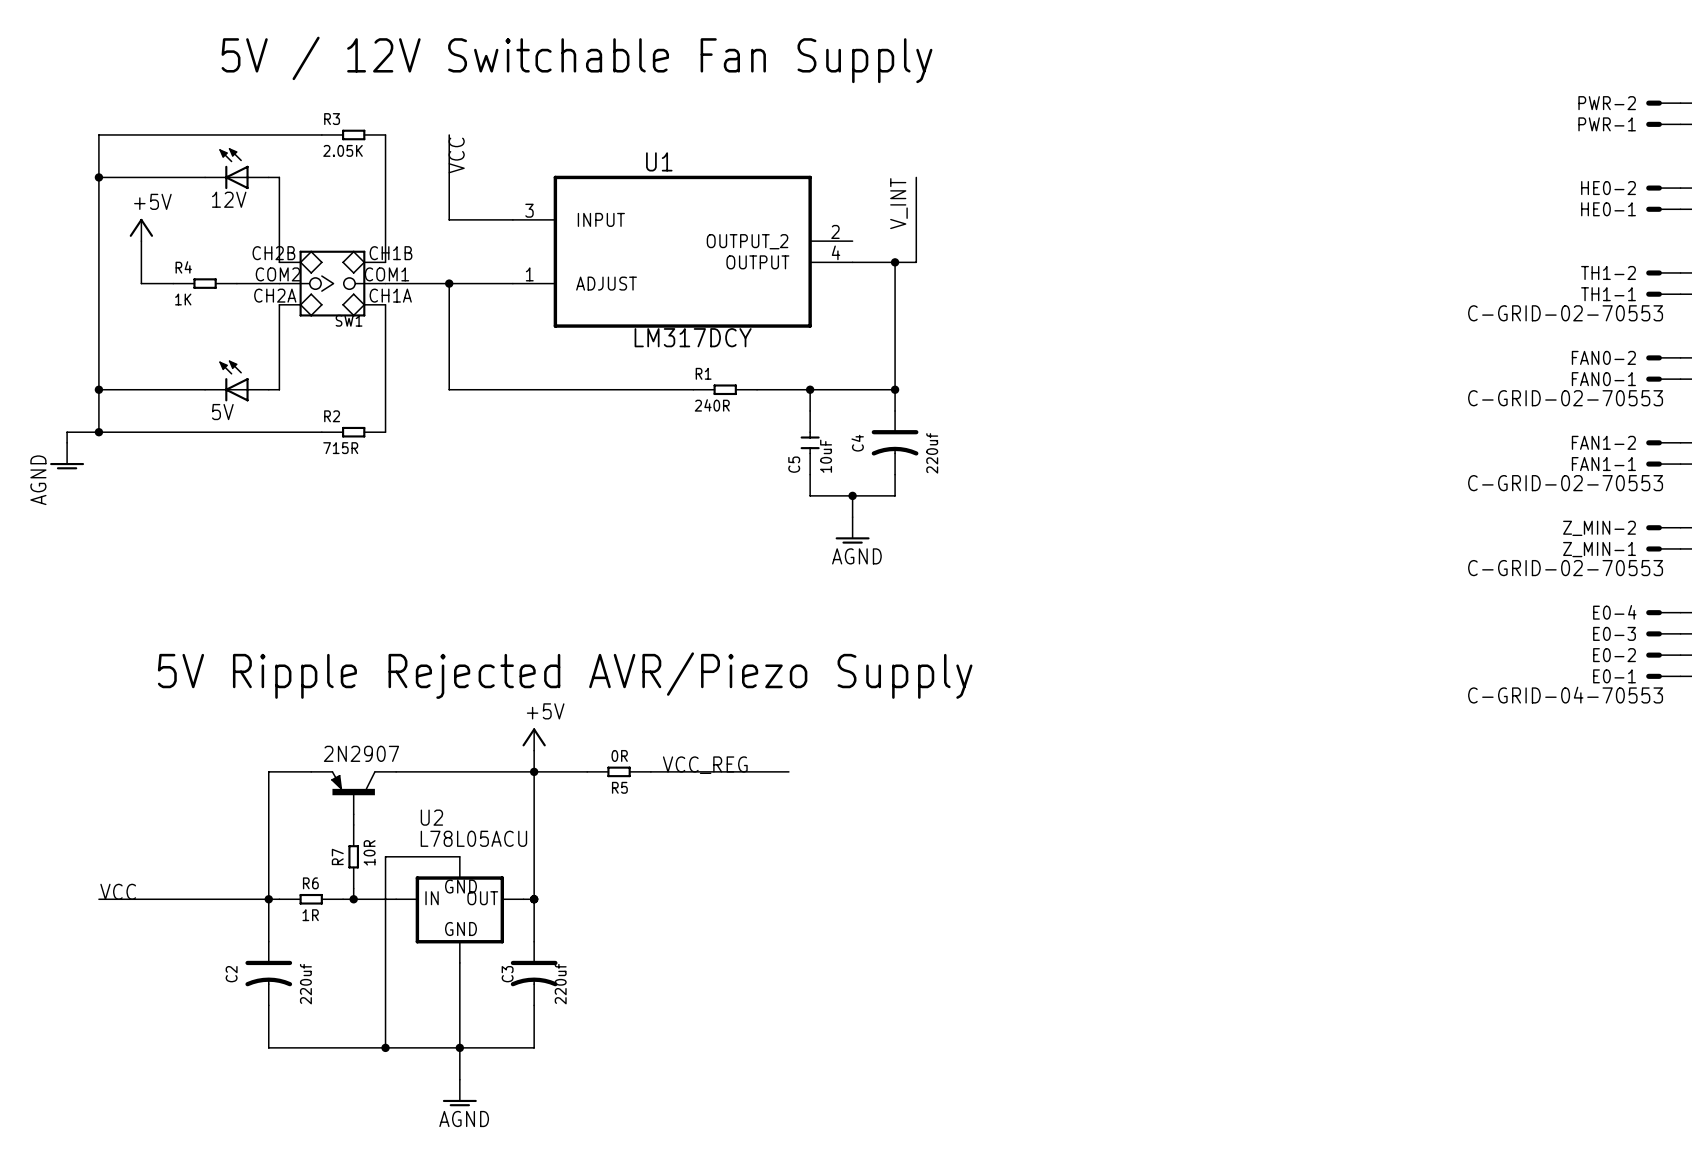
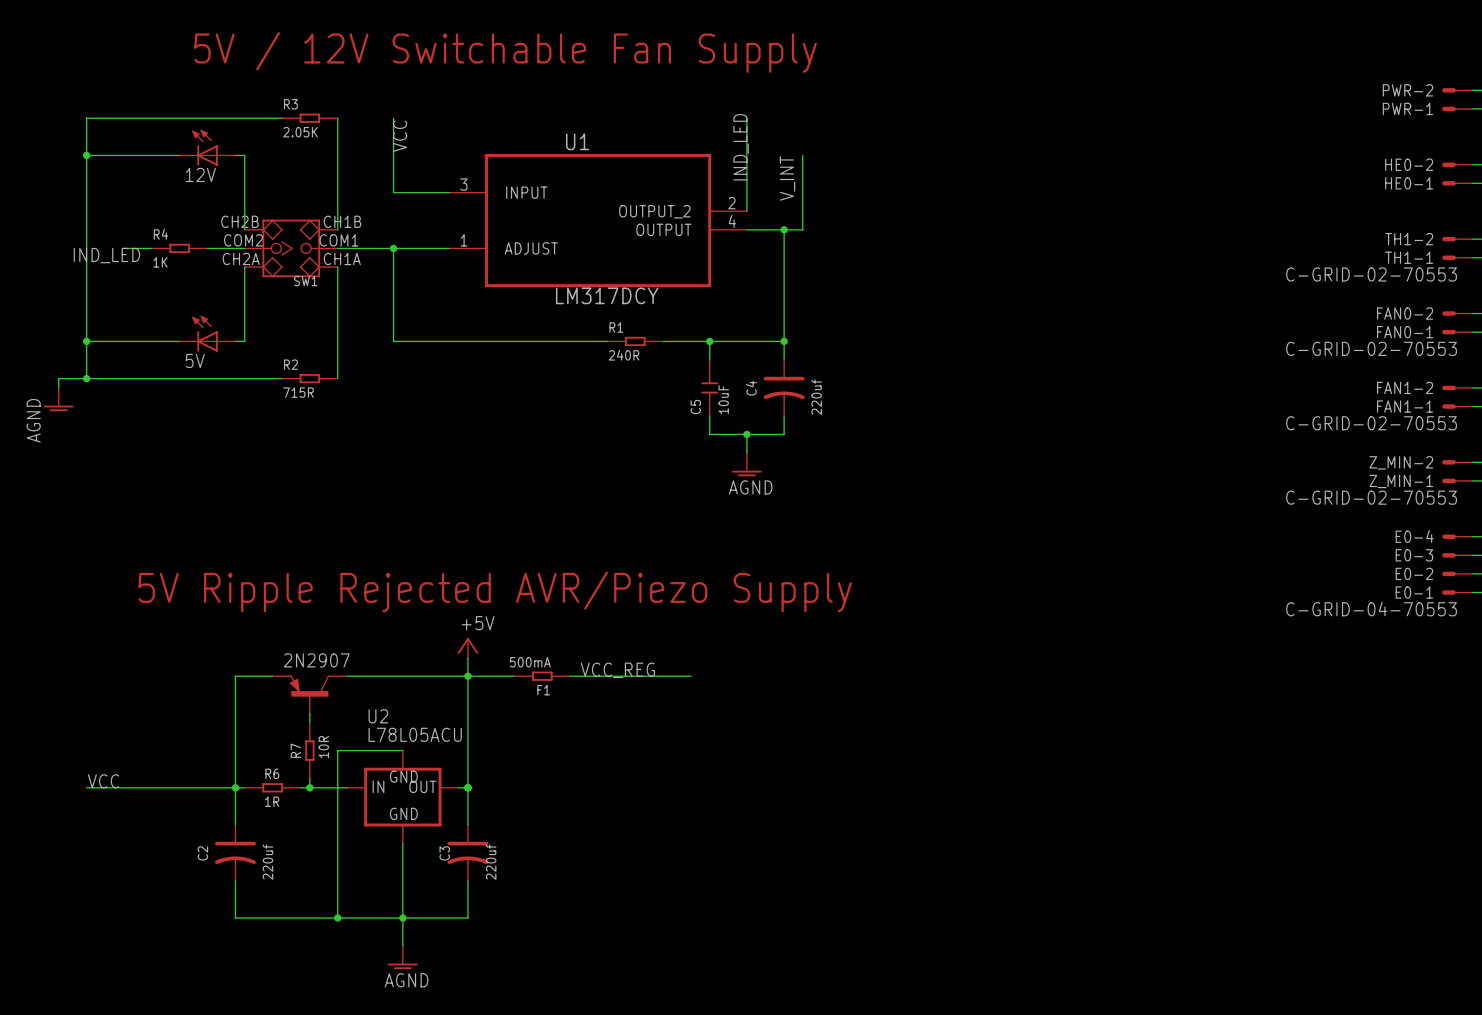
wire: none -> (746, 118) (746, 211)
label: none -> IND_LED (741, 147)
power symbol: +5V (141, 229) -> none
wire: (141, 241) (141, 283) -> none
label: none -> IND_LED (106, 255)
R5 value: 0R (619, 755) -> 500mA (530, 662)
R5 name: R5 (619, 787) -> F1 (543, 690)

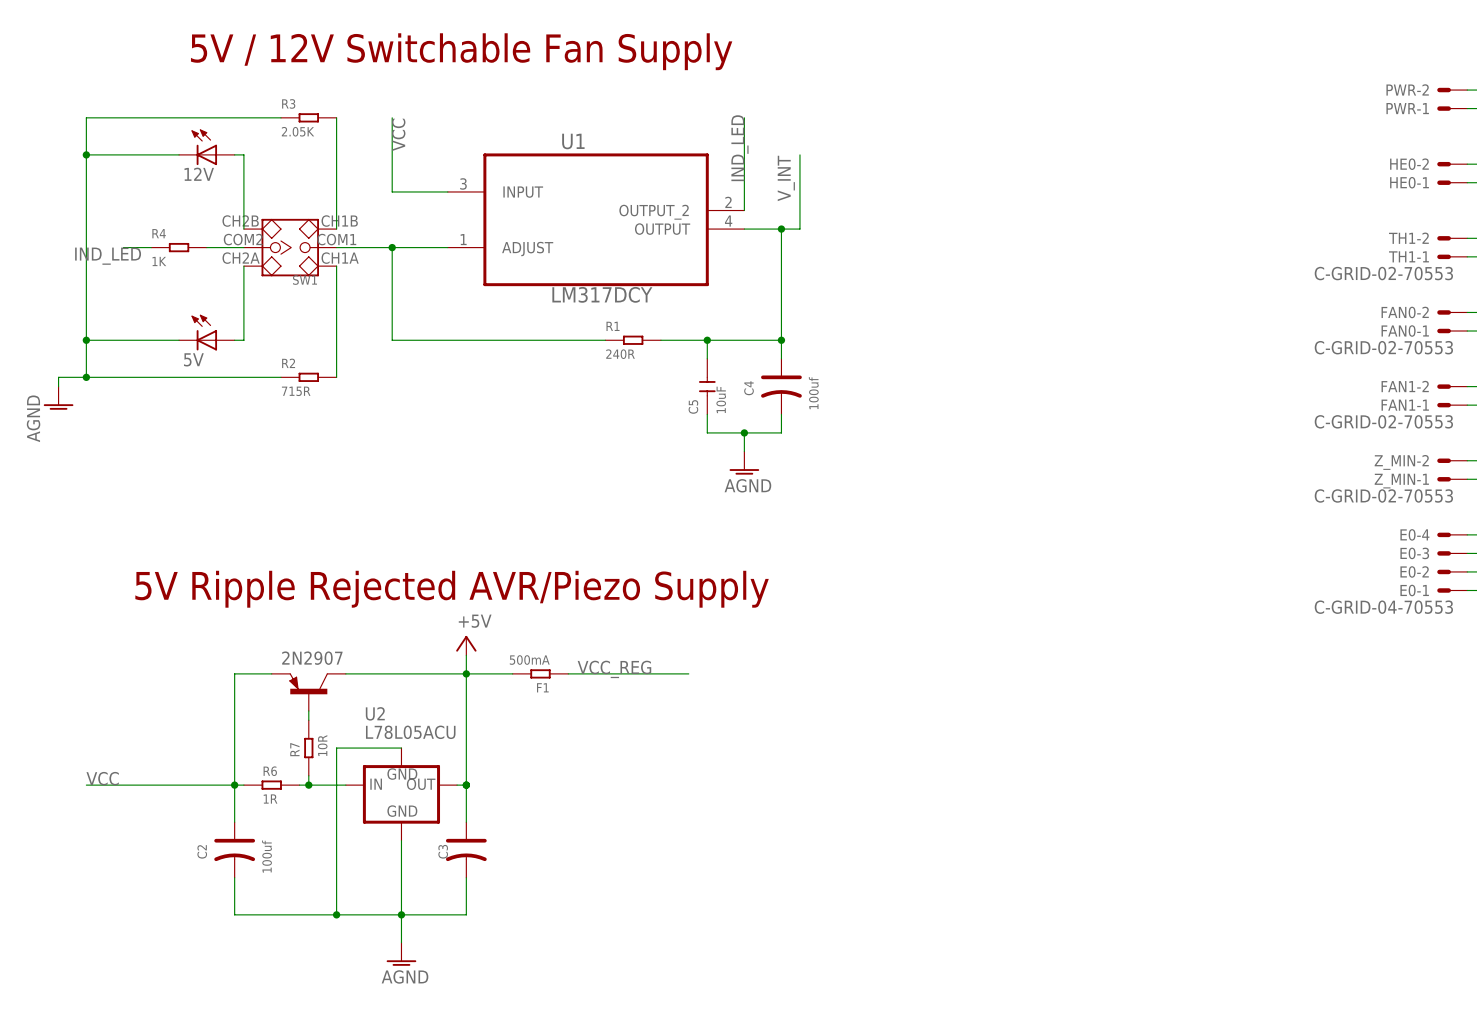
C4 value: 220uf (816, 397) -> 100uf (813, 393)
C2 value: 220uf (268, 862) -> 100uf (266, 856)
C3 value: 220uf (491, 862) -> none

